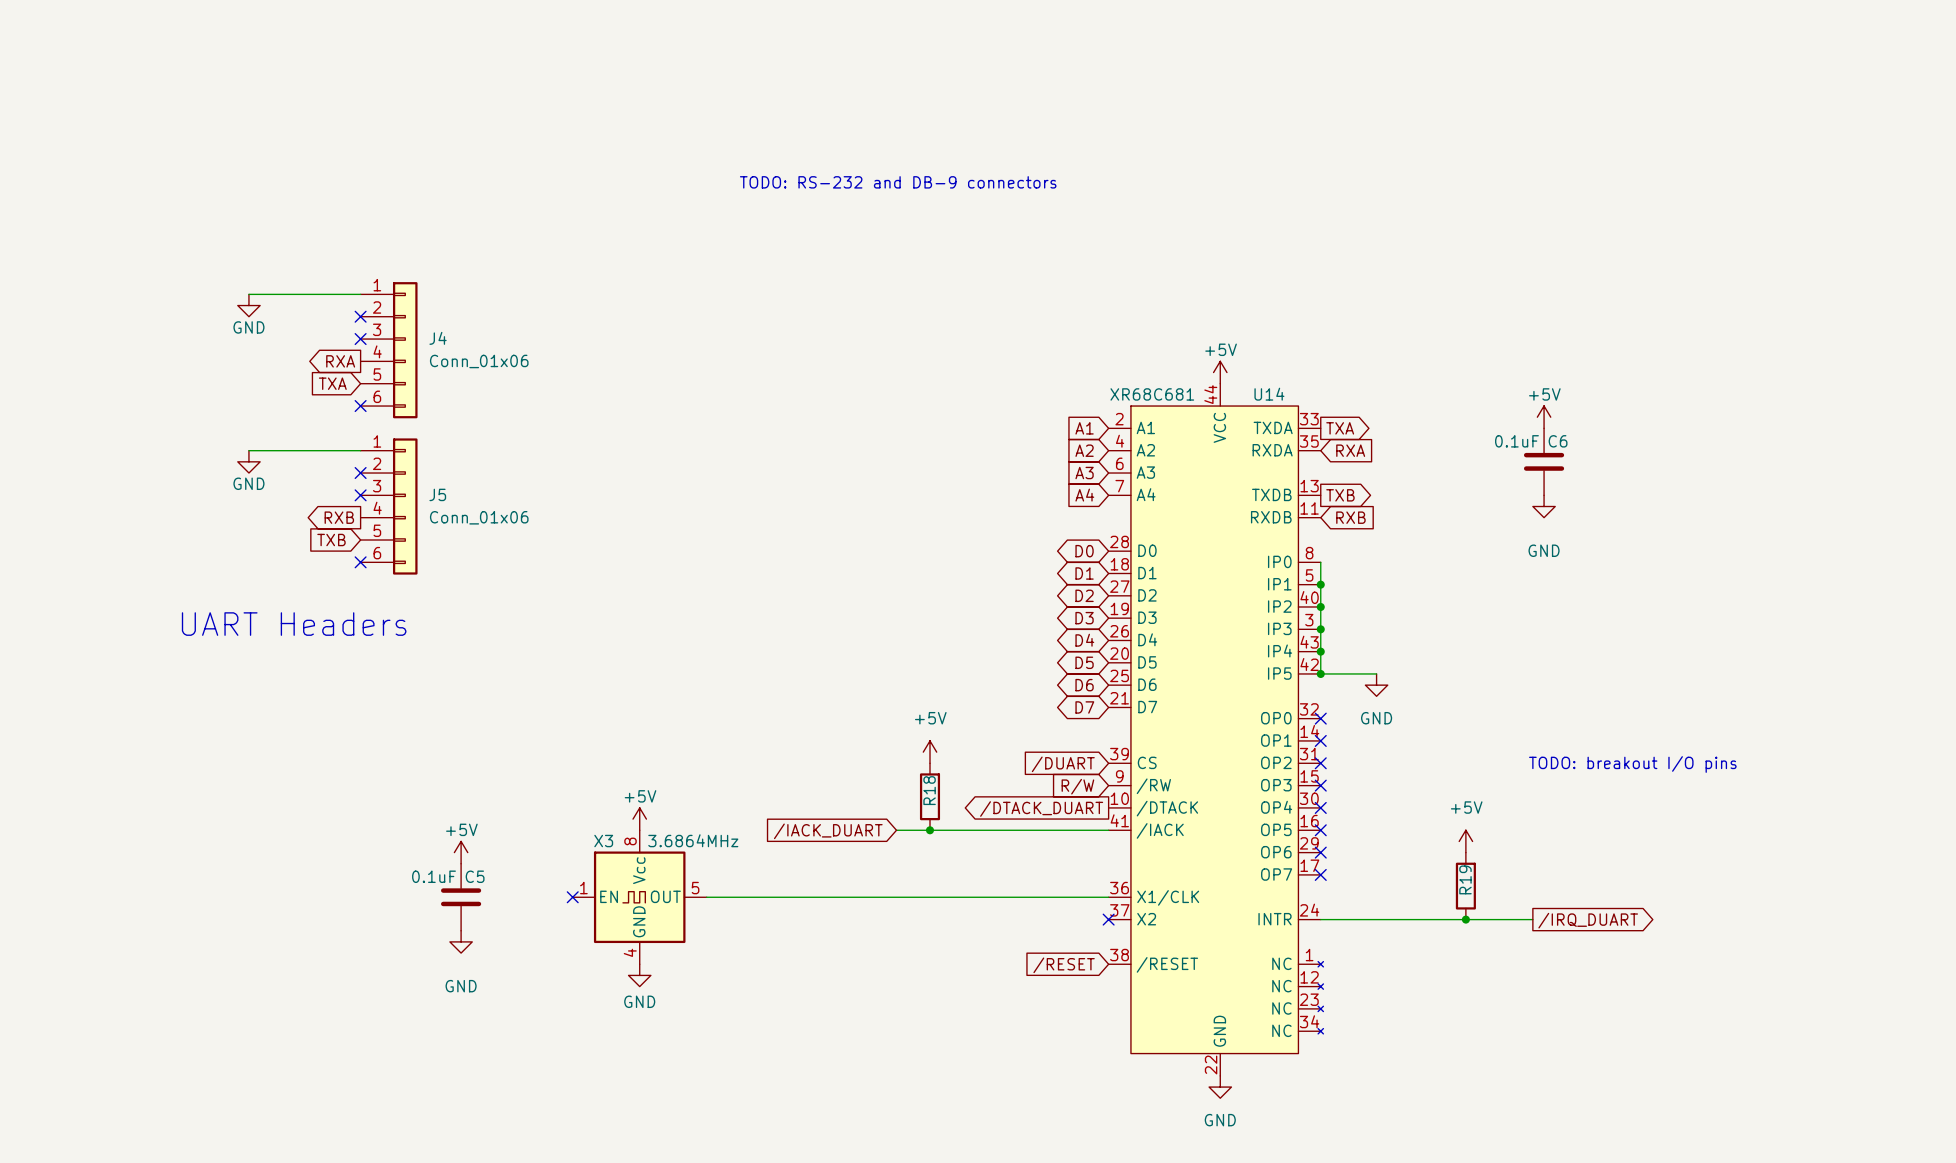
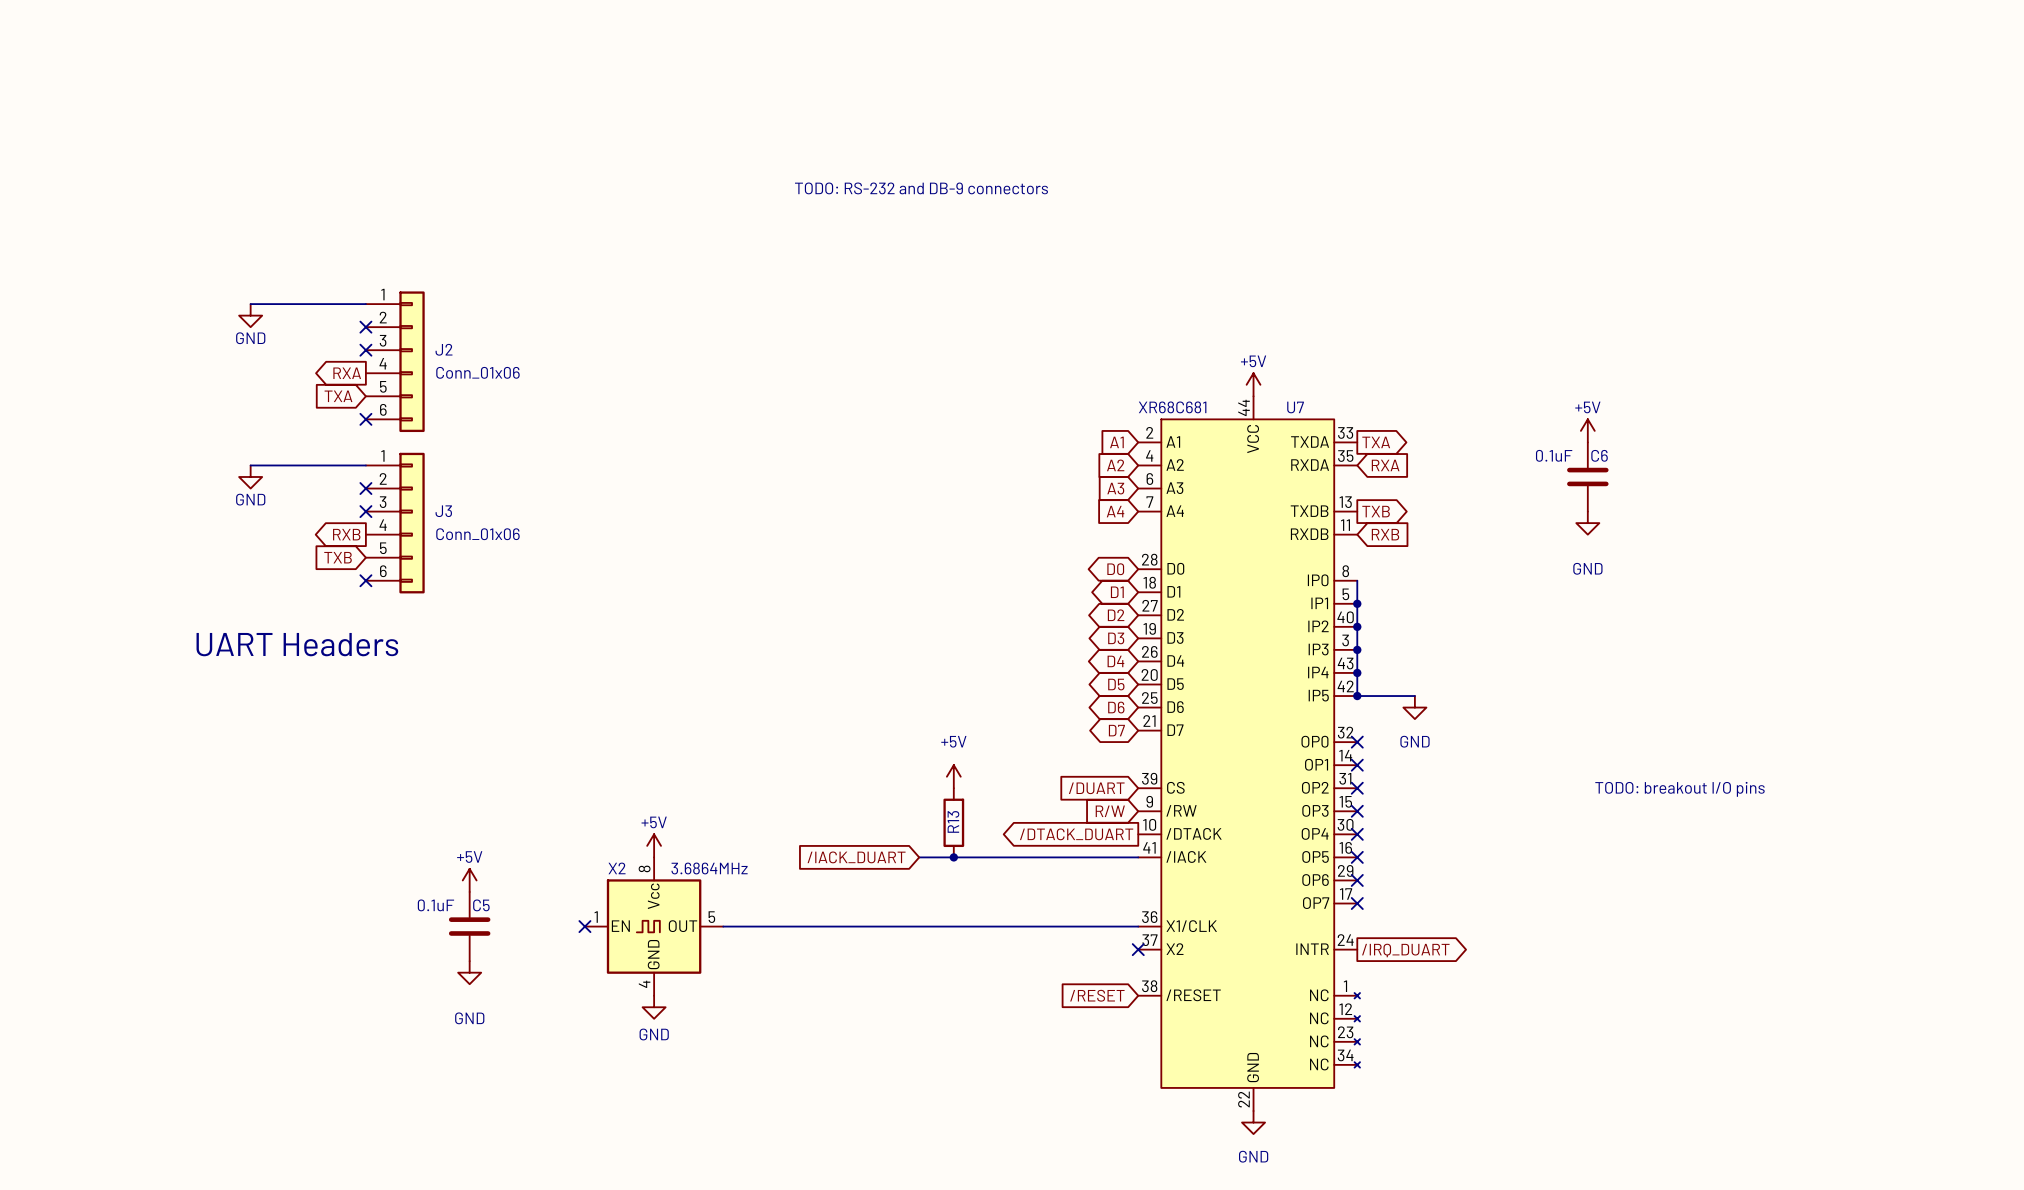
J4 name: J4 (438, 338) -> J2 (444, 349)
U14 name: U14 (1269, 394) -> U7 (1295, 407)
J5 name: J5 (437, 494) -> J3 (443, 511)
R18 name: R18 (929, 790) -> R13 (953, 821)
X3 name: X3 (603, 841) -> X2 (617, 868)
power symbol: +5V (1465, 841) -> none
R19: (1465, 886) -> none
wire: (1320, 919) (1532, 919) -> none
junction: (1465, 919) -> none
global label position: /IRQ_DUART (1588, 920) -> /IRQ_DUART (1405, 950)

